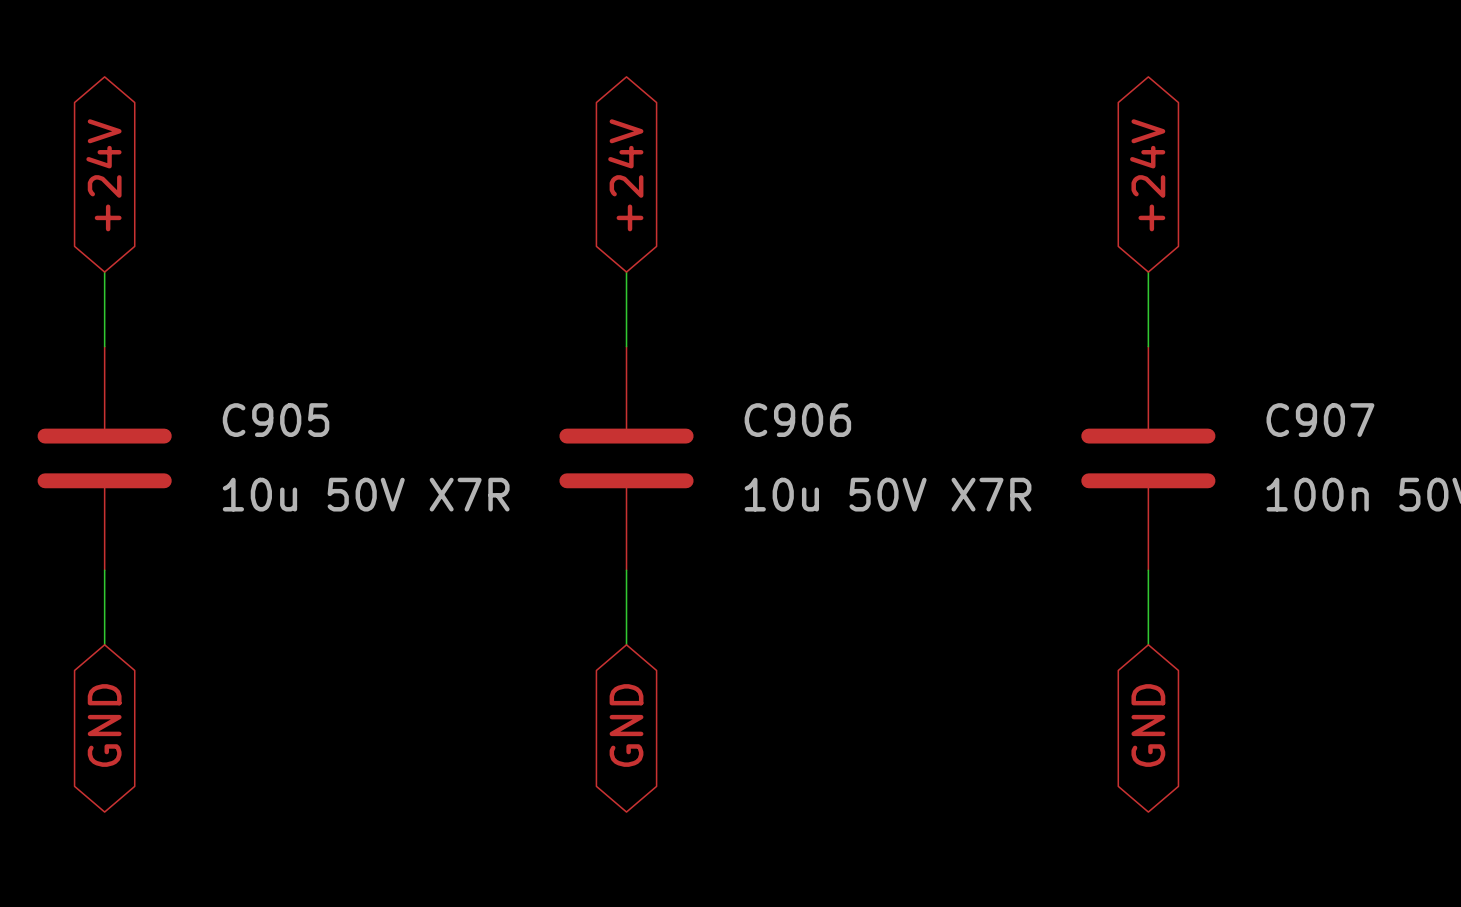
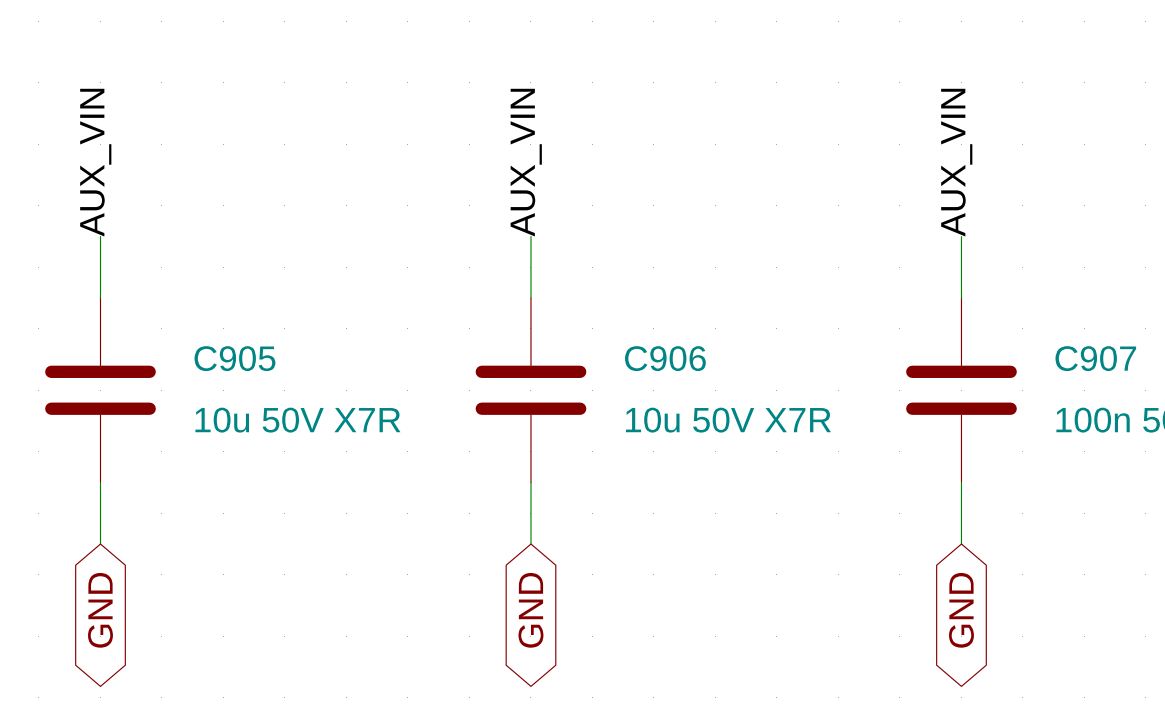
global label: +24V (103, 175) -> none
global label: +24V (625, 175) -> none
global label: +24V (1147, 175) -> none
label: none -> AUX_VIN (95, 162)
label: none -> AUX_VIN (526, 162)
label: none -> AUX_VIN (956, 162)

